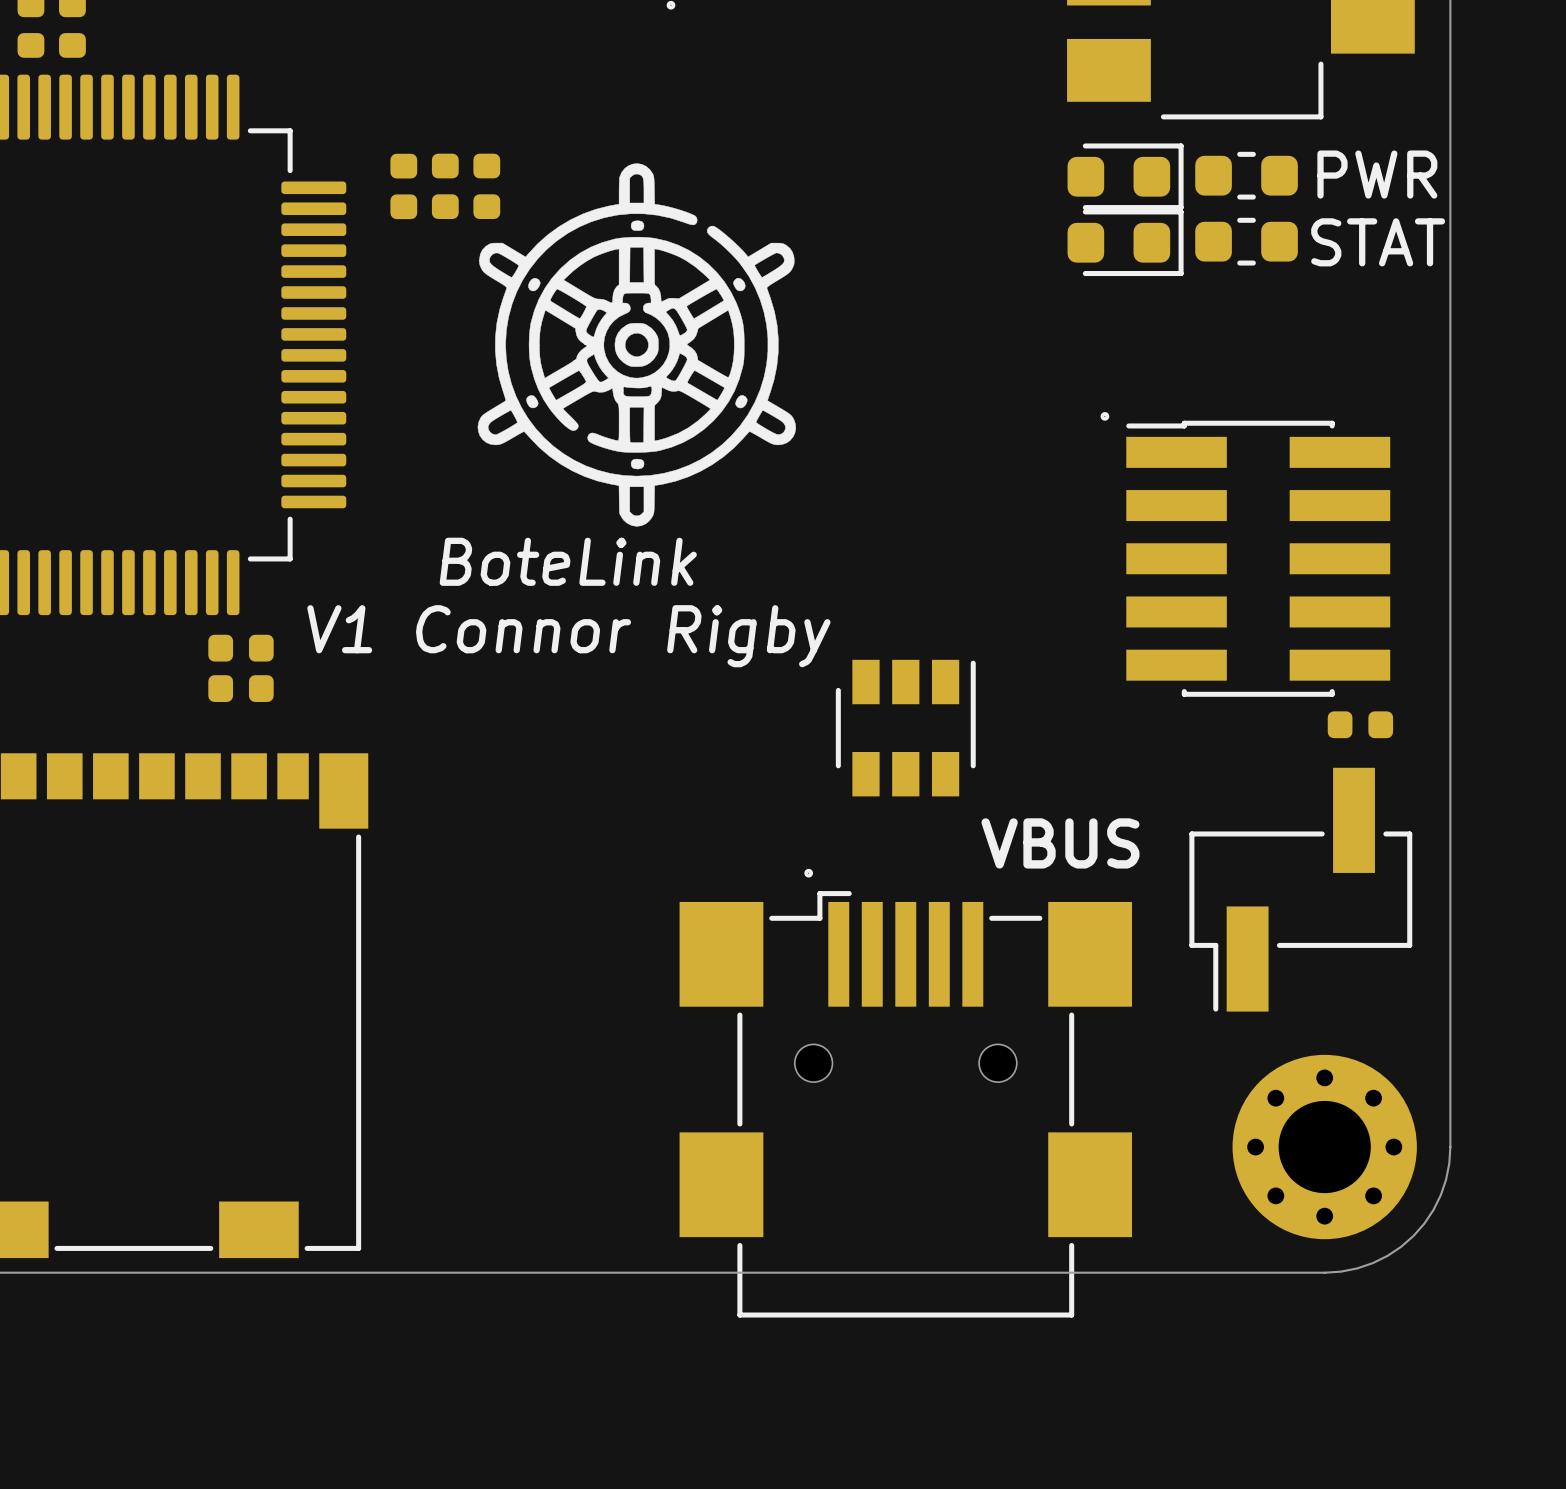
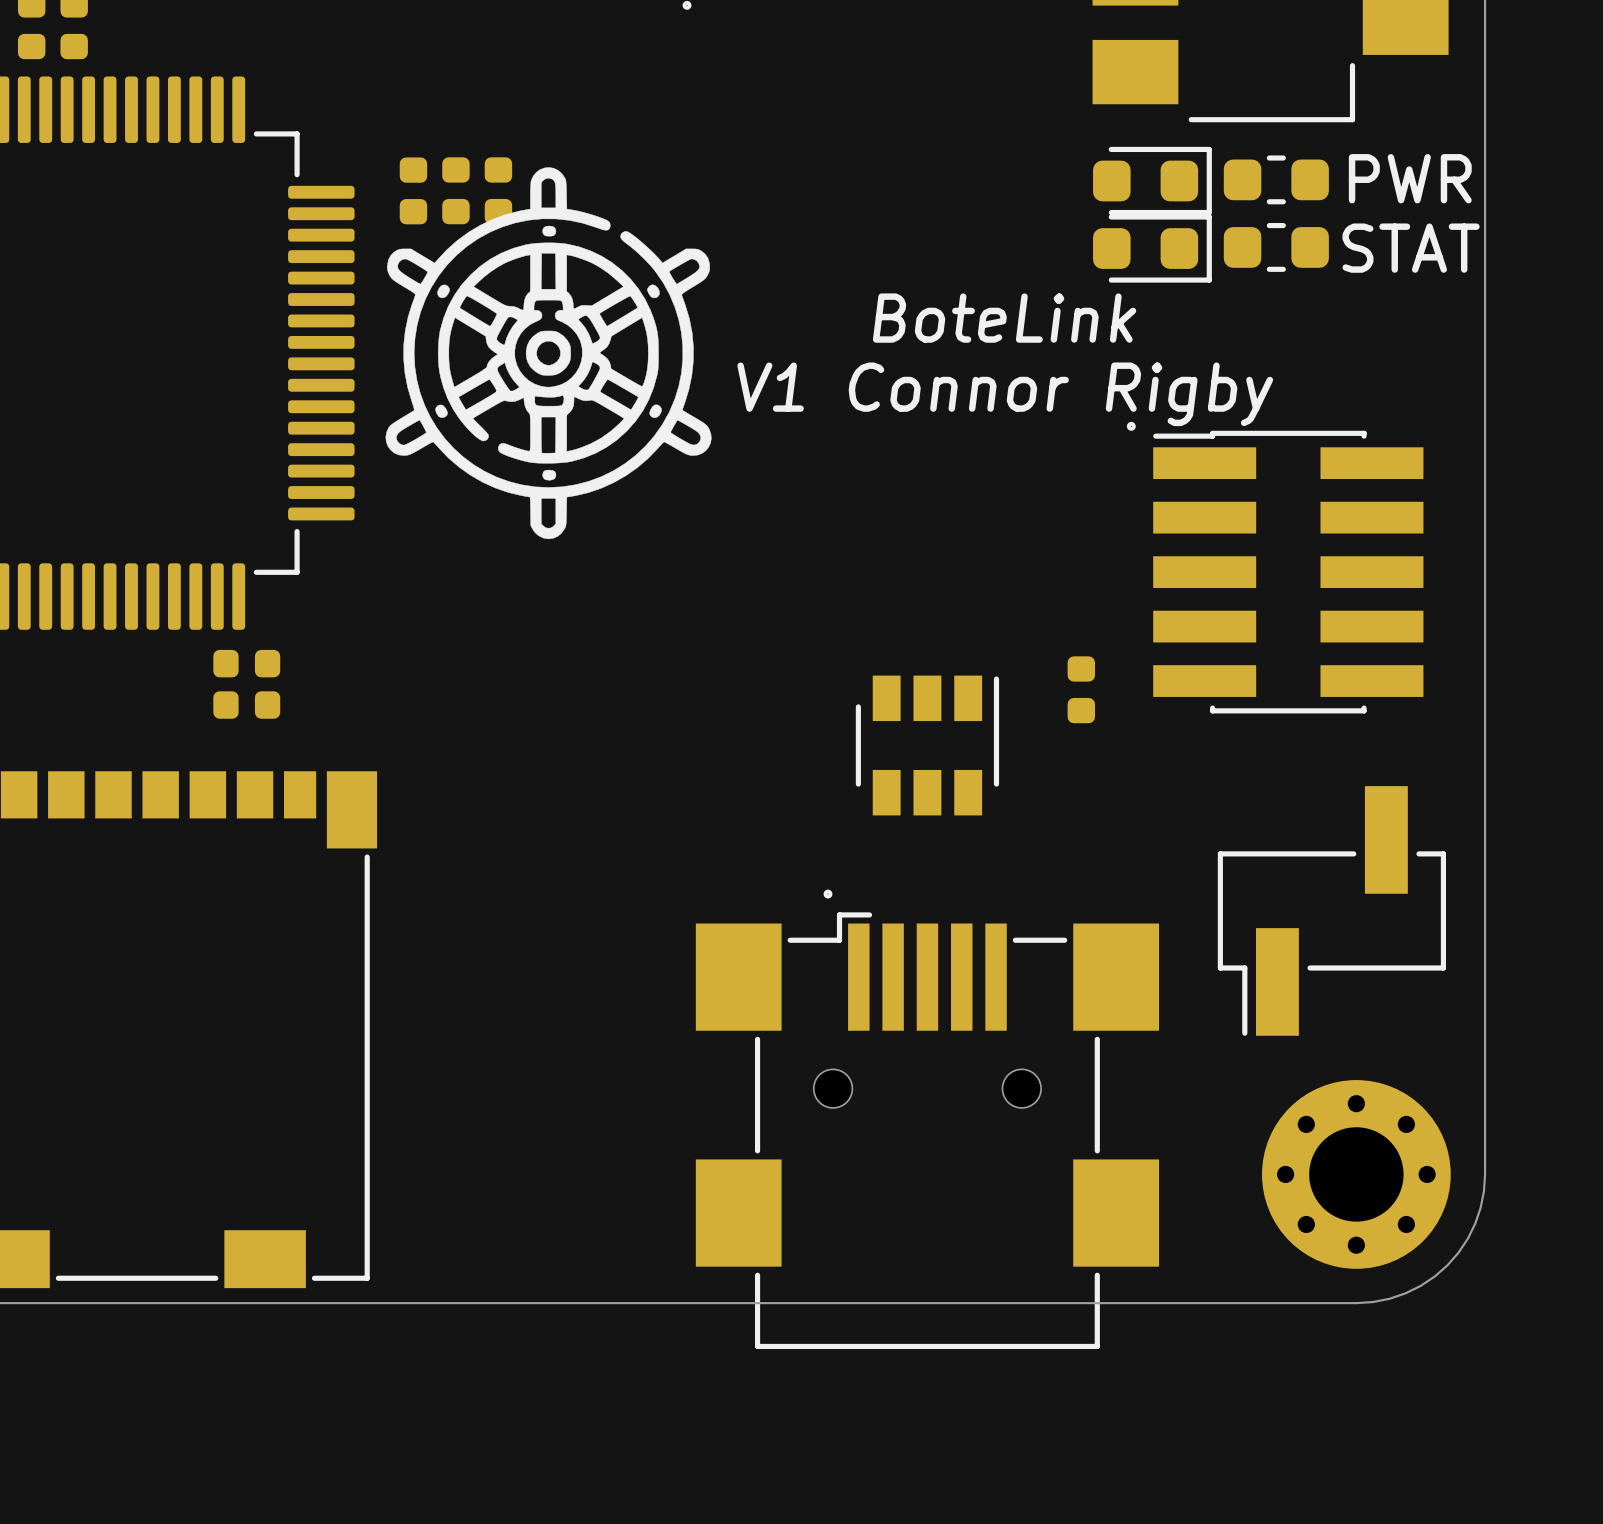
drawing position: (636, 344) -> (548, 353)
text position: BoteLink (568, 561) -> BoteLink (1004, 318)
text position: V1 Connor Rigby (568, 636) -> V1 Connor Rigby (1005, 394)
part rotation: 0° (1360, 724) -> 90° clockwise (1081, 689)
part position: (1360, 724) -> (1081, 689)
text: VBUS (1060, 843) -> none

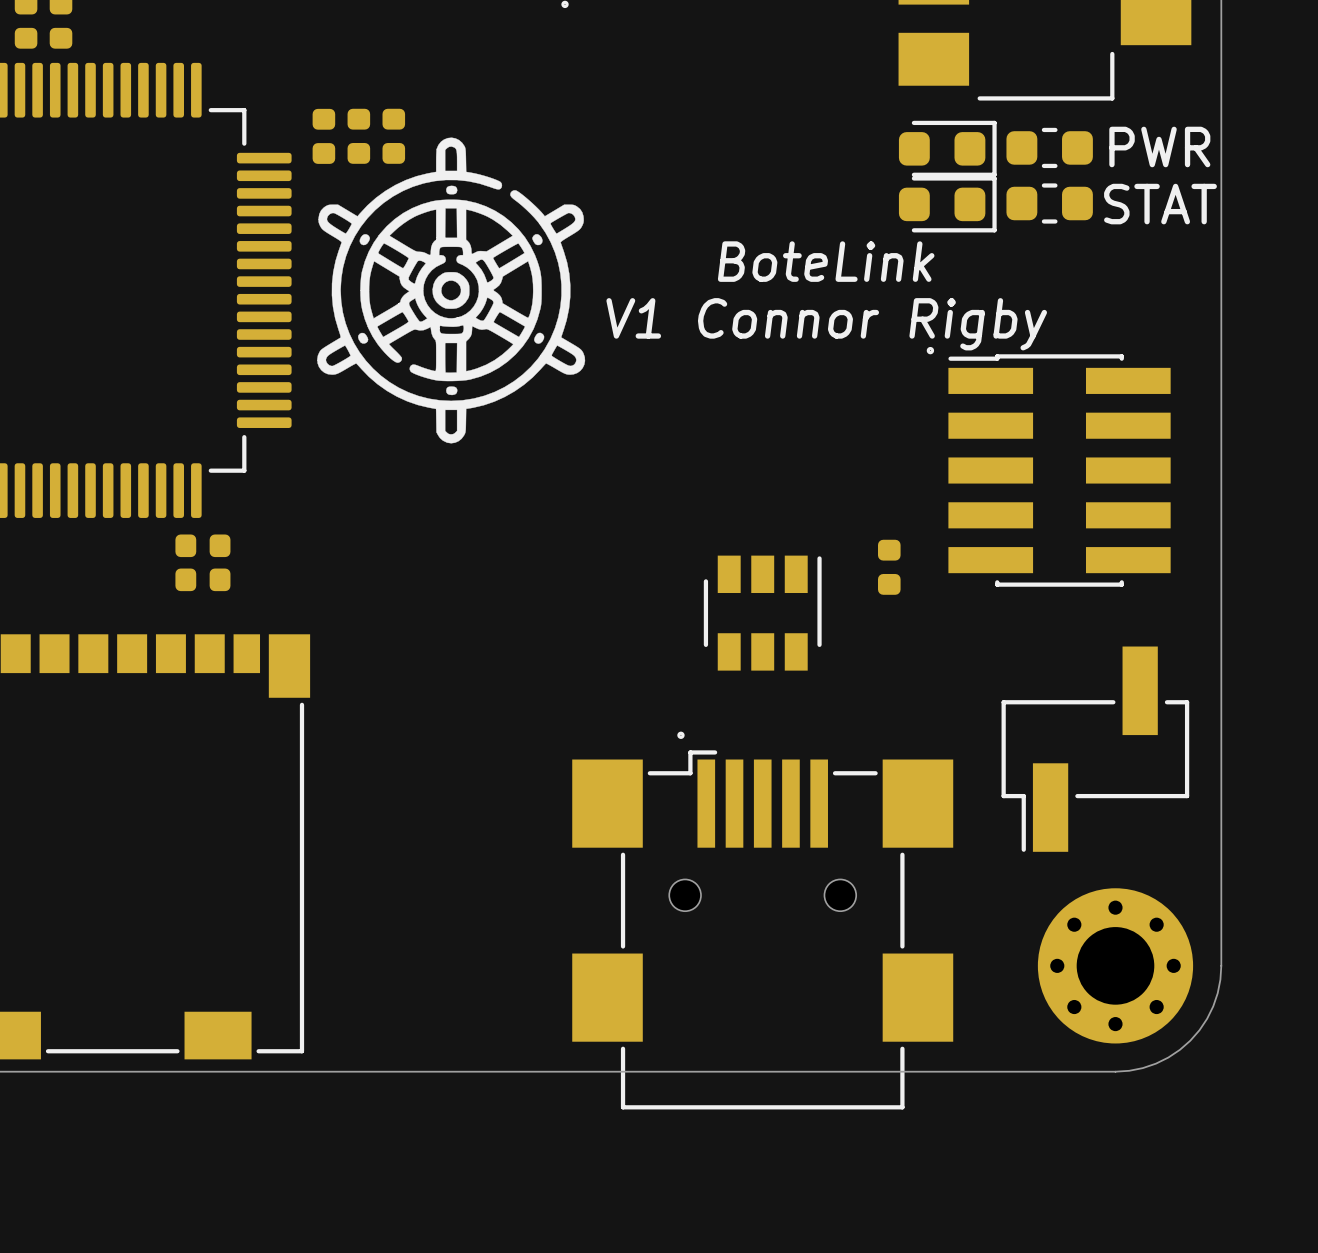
part: none -> (323, 136)
part: none -> (358, 136)
part: none -> (393, 136)
part: (413, 190) -> none
part: (455, 190) -> none
part: (498, 190) -> none

